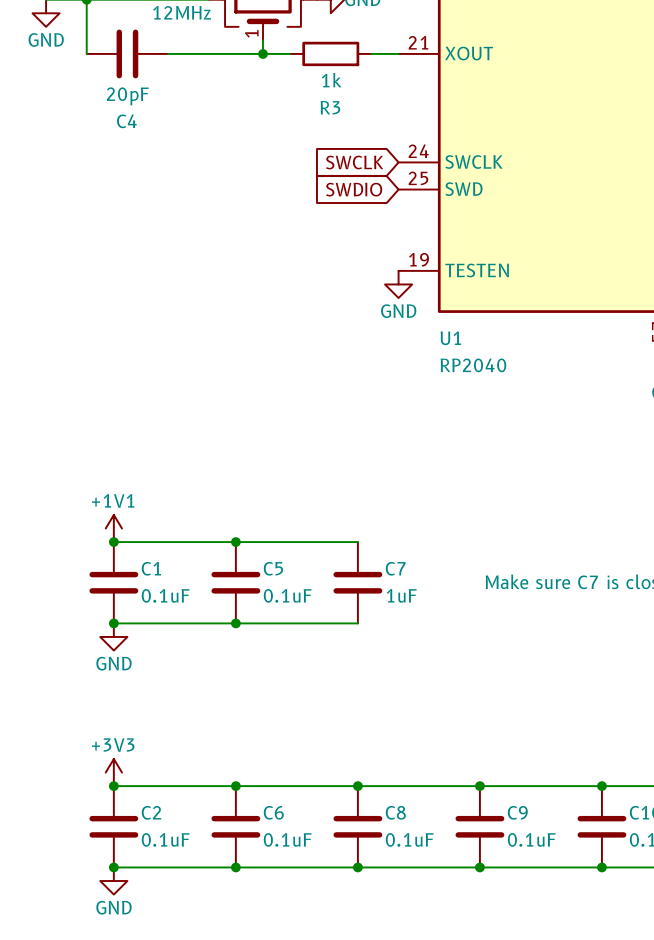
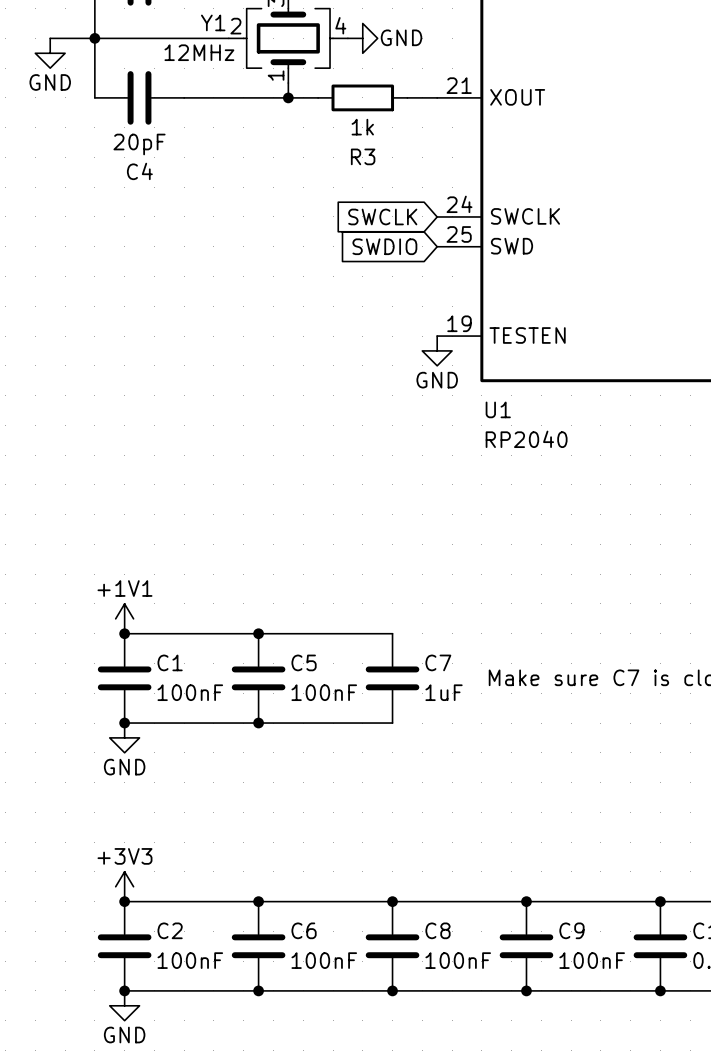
C1 value: 0.1uF (165, 595) -> 100nF (190, 692)
C5 value: 0.1uF (287, 595) -> 100nF (324, 692)
C2 value: 0.1uF (165, 839) -> 100nF (190, 960)
C6 value: 0.1uF (287, 839) -> 100nF (324, 960)
C8 value: 0.1uF (409, 839) -> 100nF (458, 960)
C9 value: 0.1uF (531, 839) -> 100nF (592, 960)

